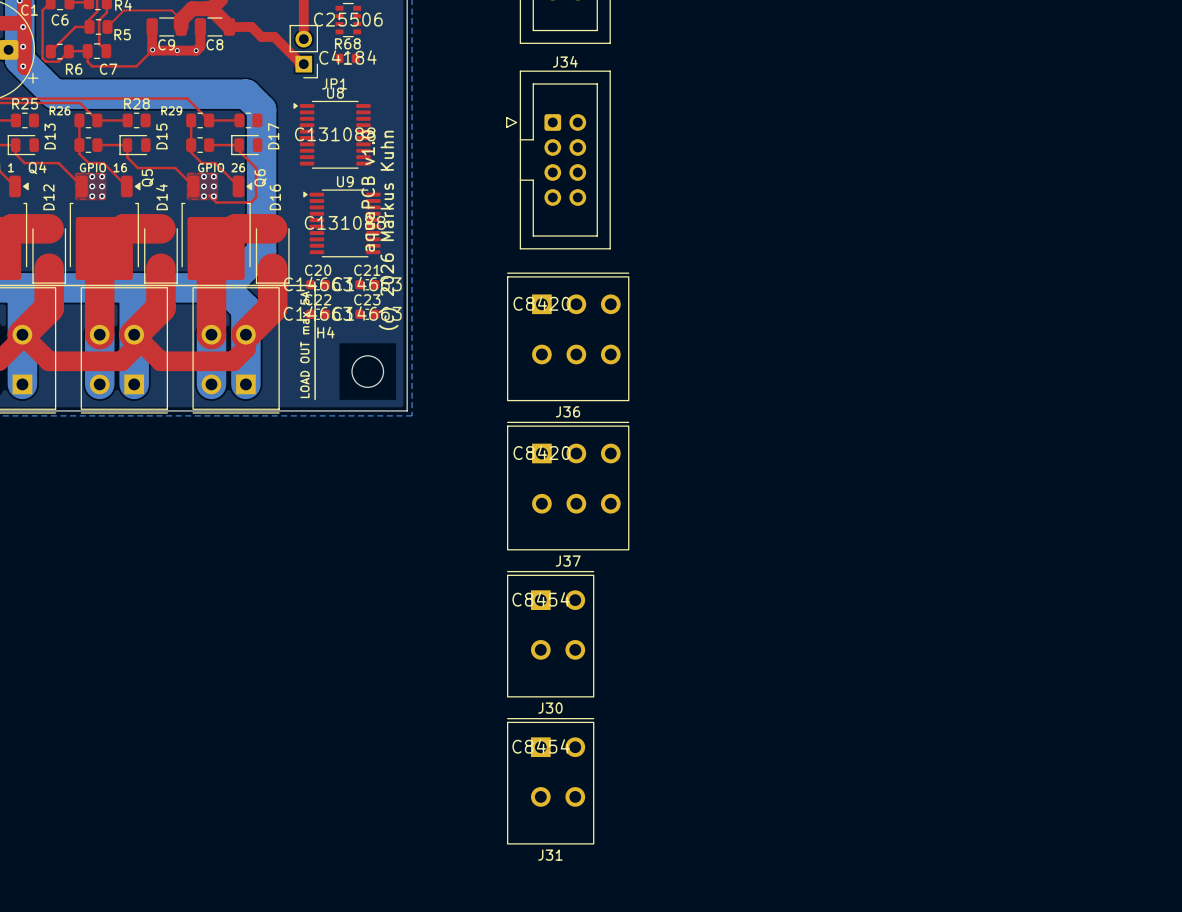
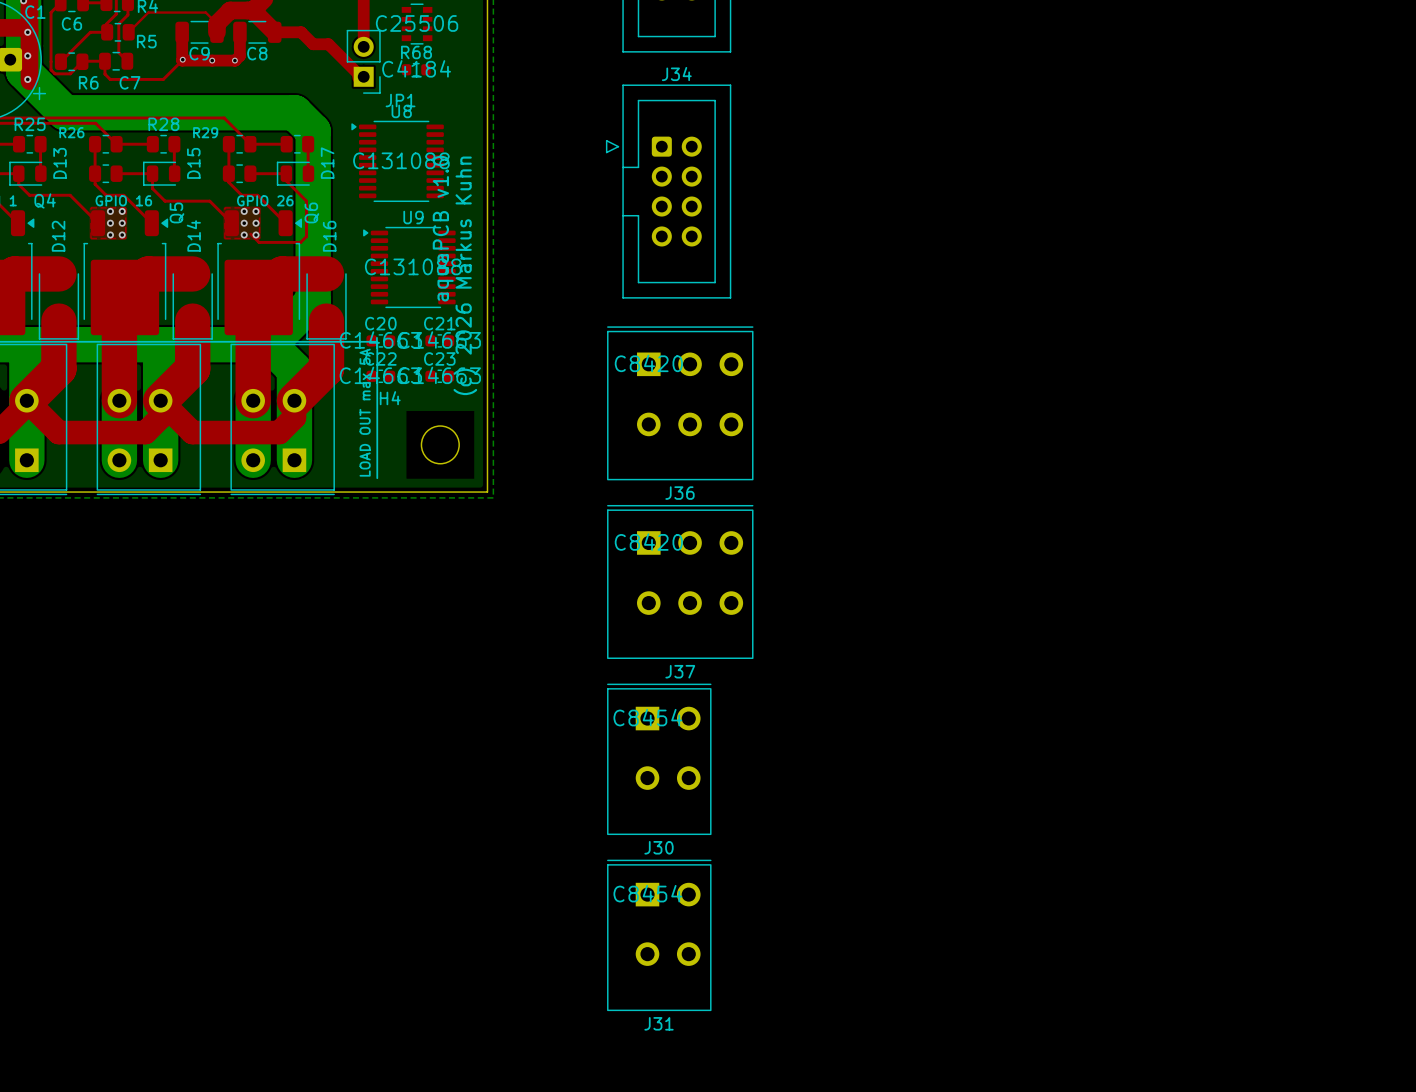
top track: none -> (40, 144) (40, 173)
top track: none -> (174, 144) (174, 173)
top track: none -> (308, 144) (308, 173)

